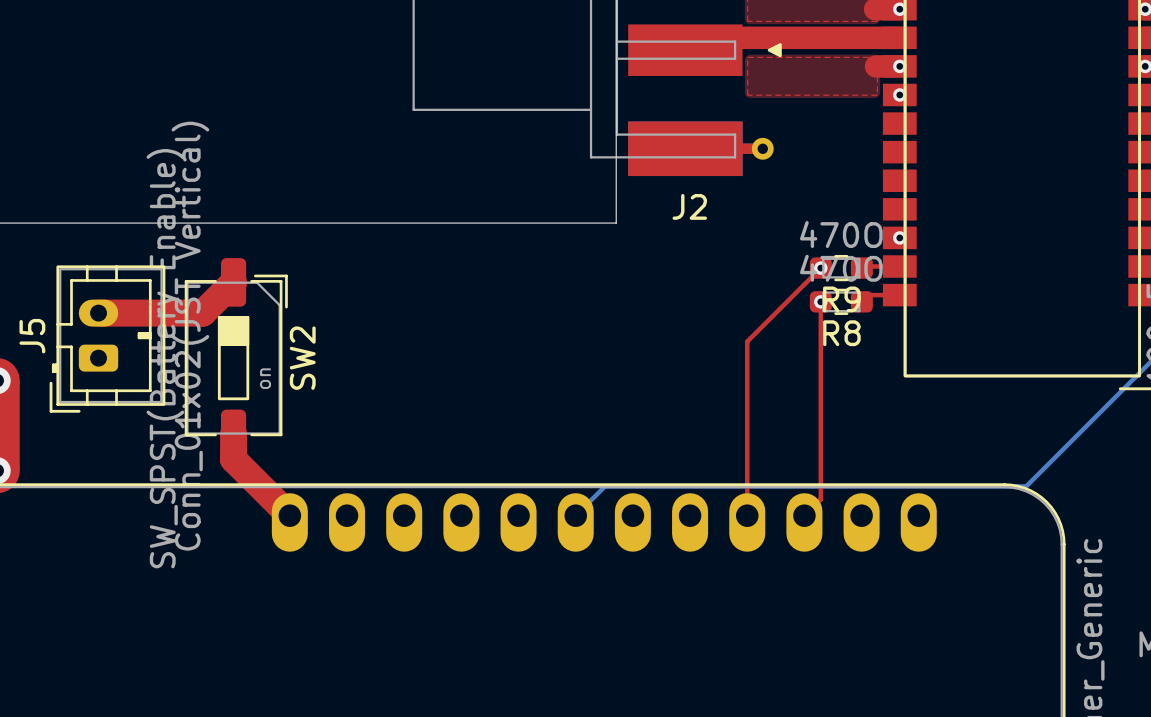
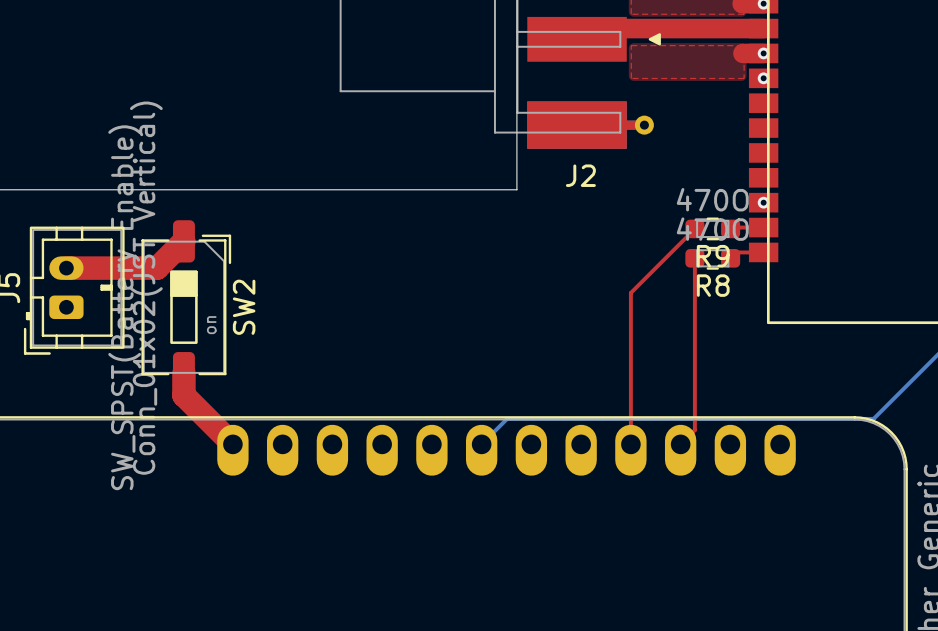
via: (820, 268) -> none
via: (820, 301) -> none

